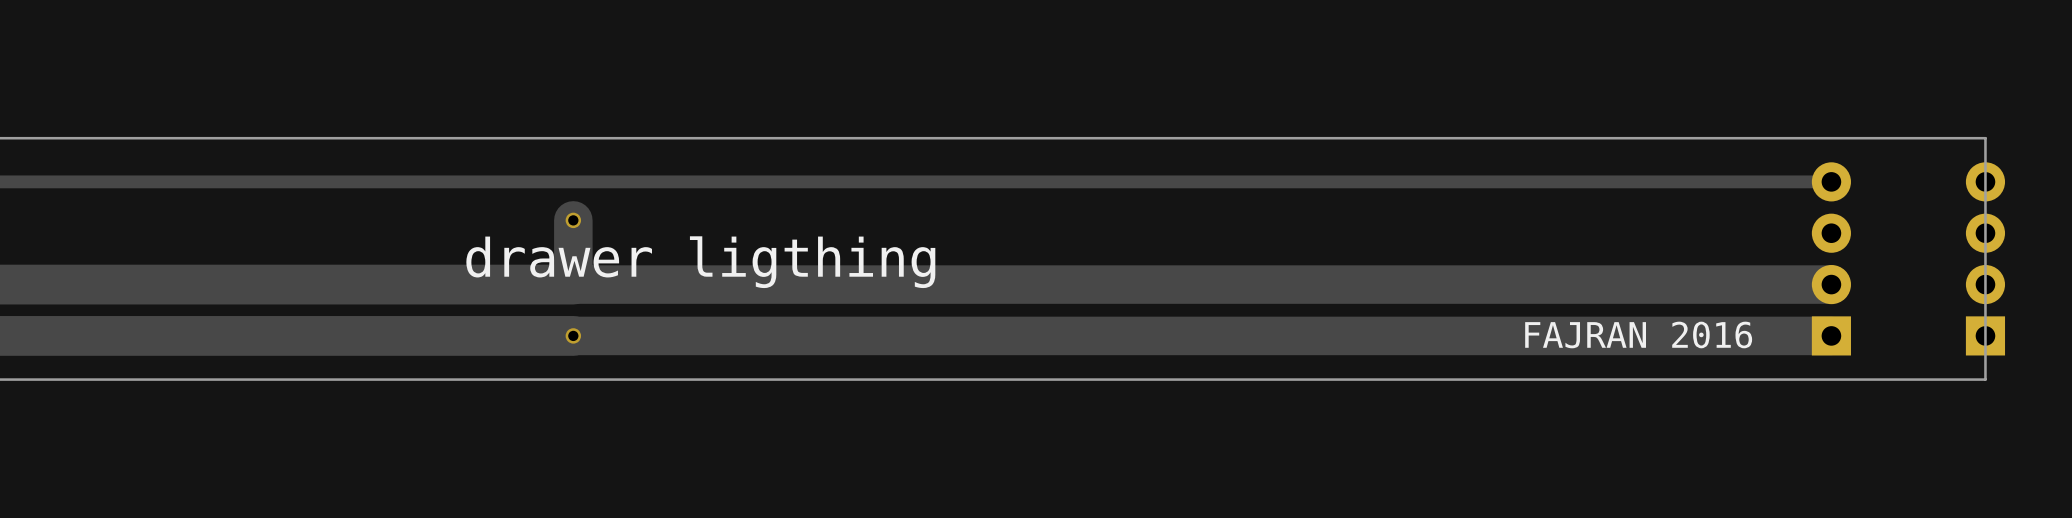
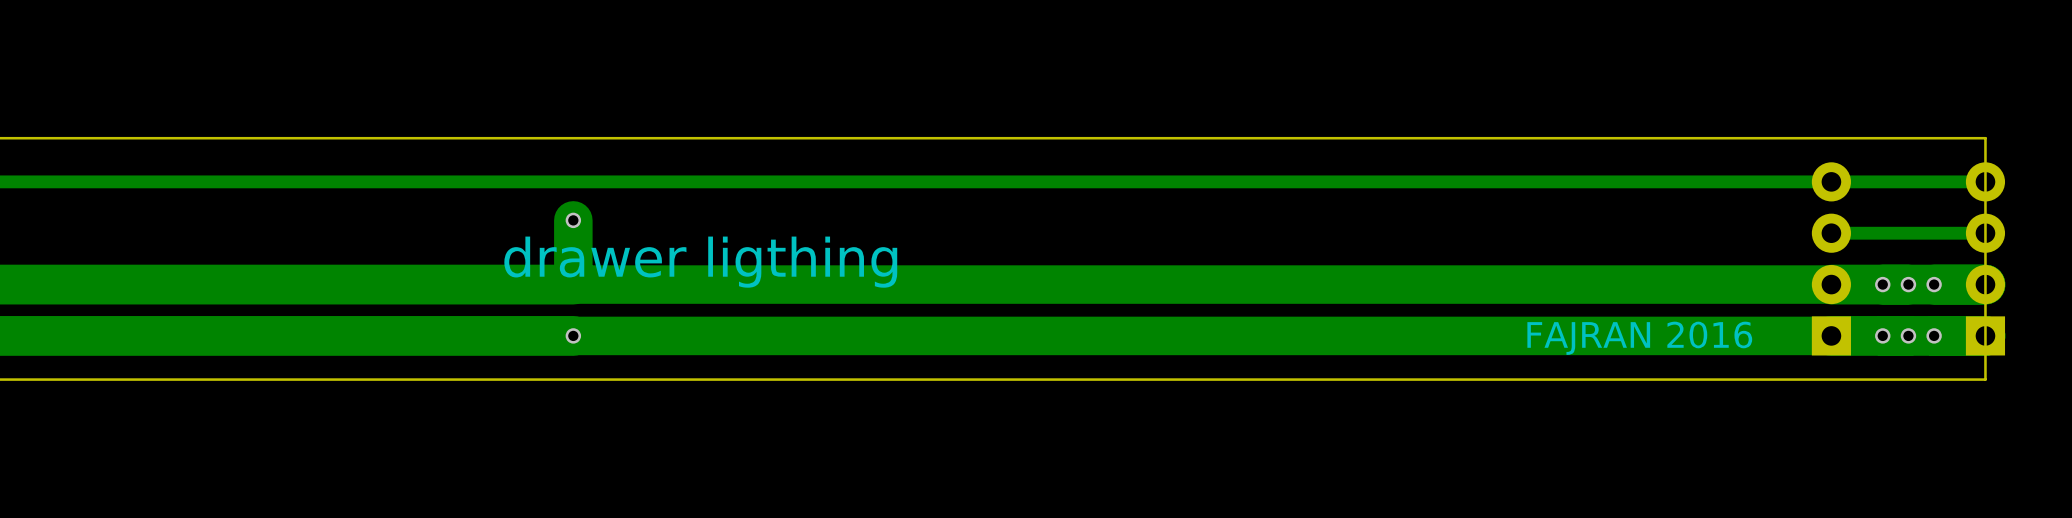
track: none -> (1985, 181) (1831, 181)
track: none -> (1985, 233) (1831, 233)
via: none -> (1882, 284)
via: none -> (1908, 284)
via: none -> (1934, 284)
track: none -> (1985, 284) (1831, 284)
via: none -> (1882, 335)
via: none -> (1908, 335)
via: none -> (1934, 335)
track: none -> (1985, 335) (1831, 335)

